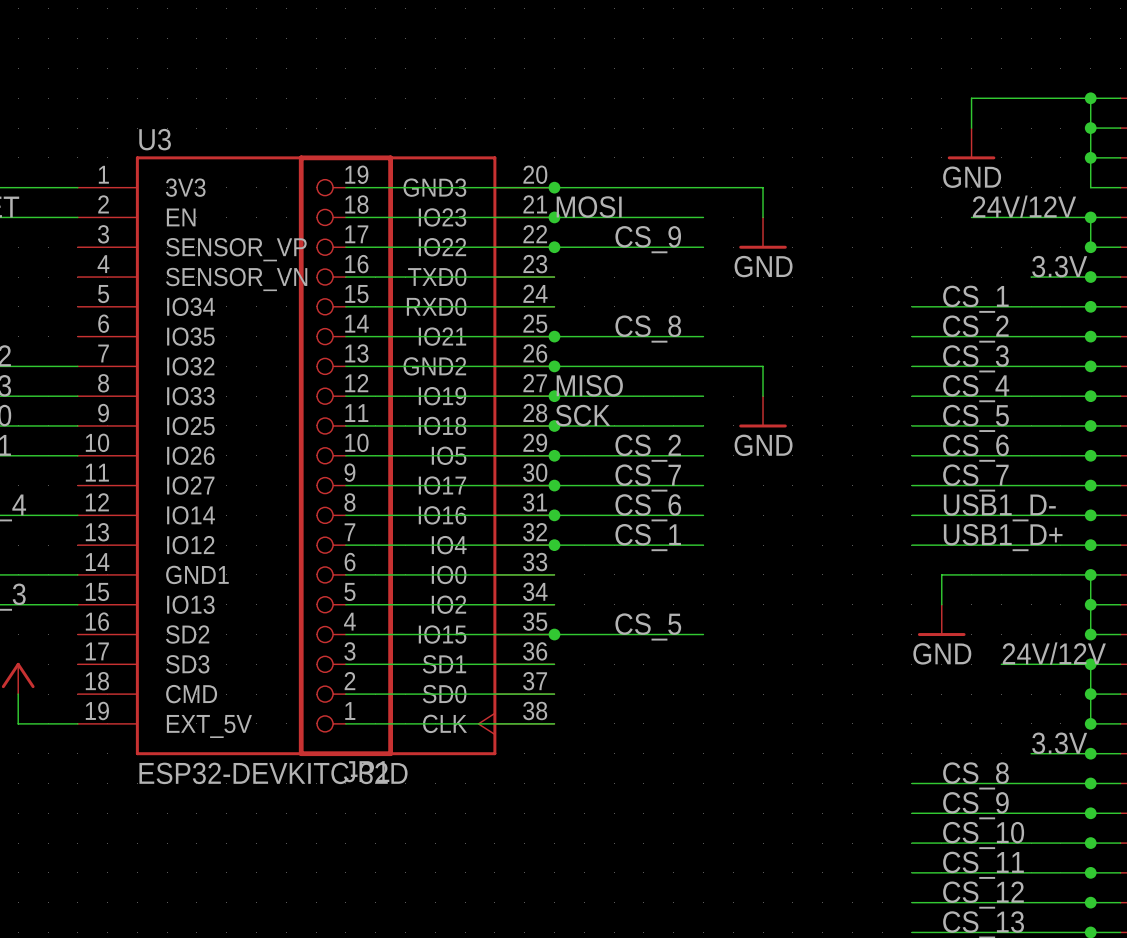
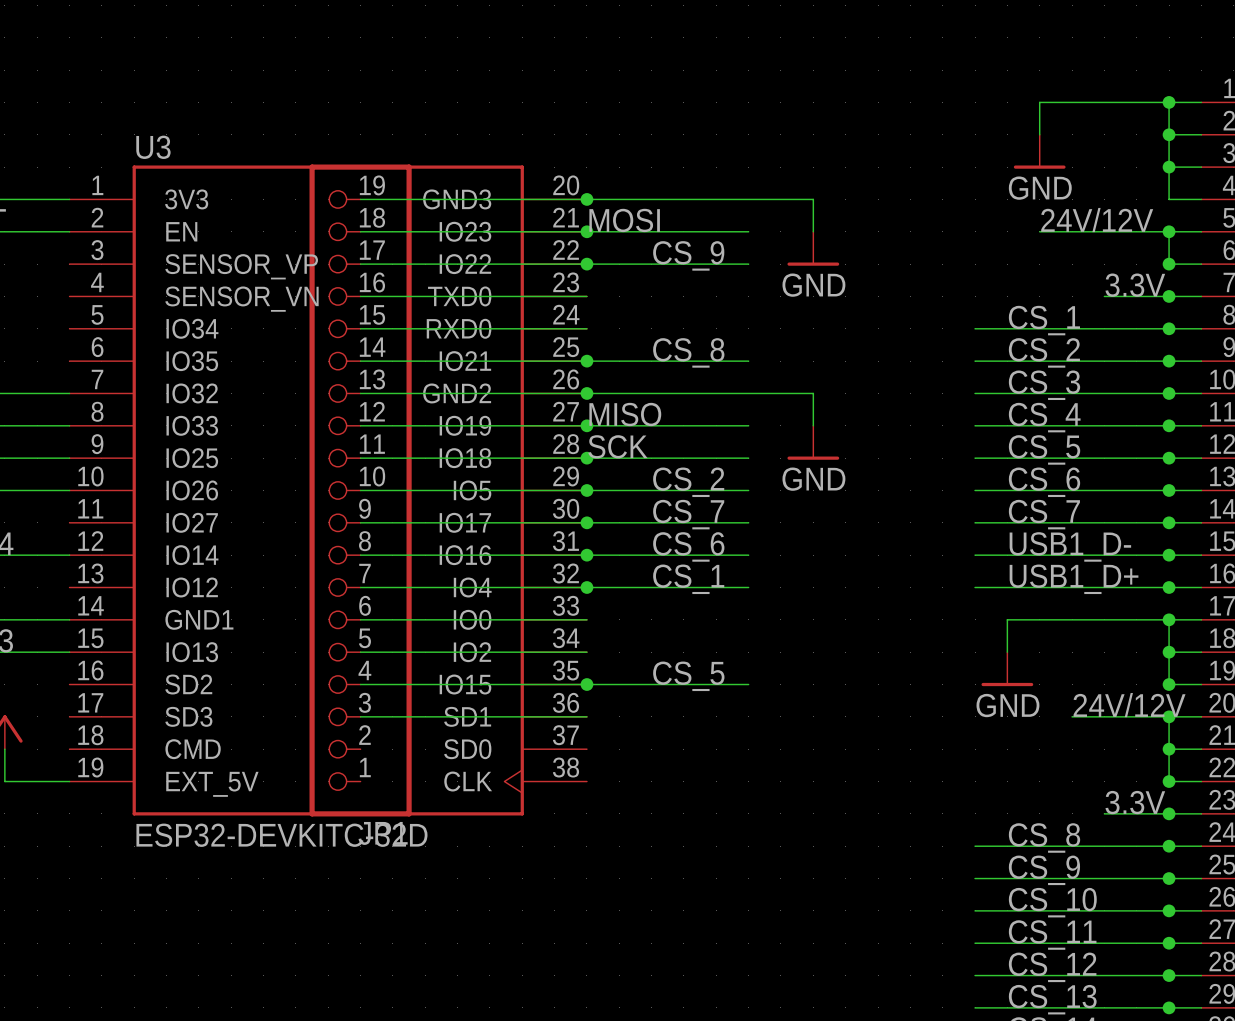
wire: (345, 694) (554, 694) -> none
wire: (345, 723) (554, 723) -> none

